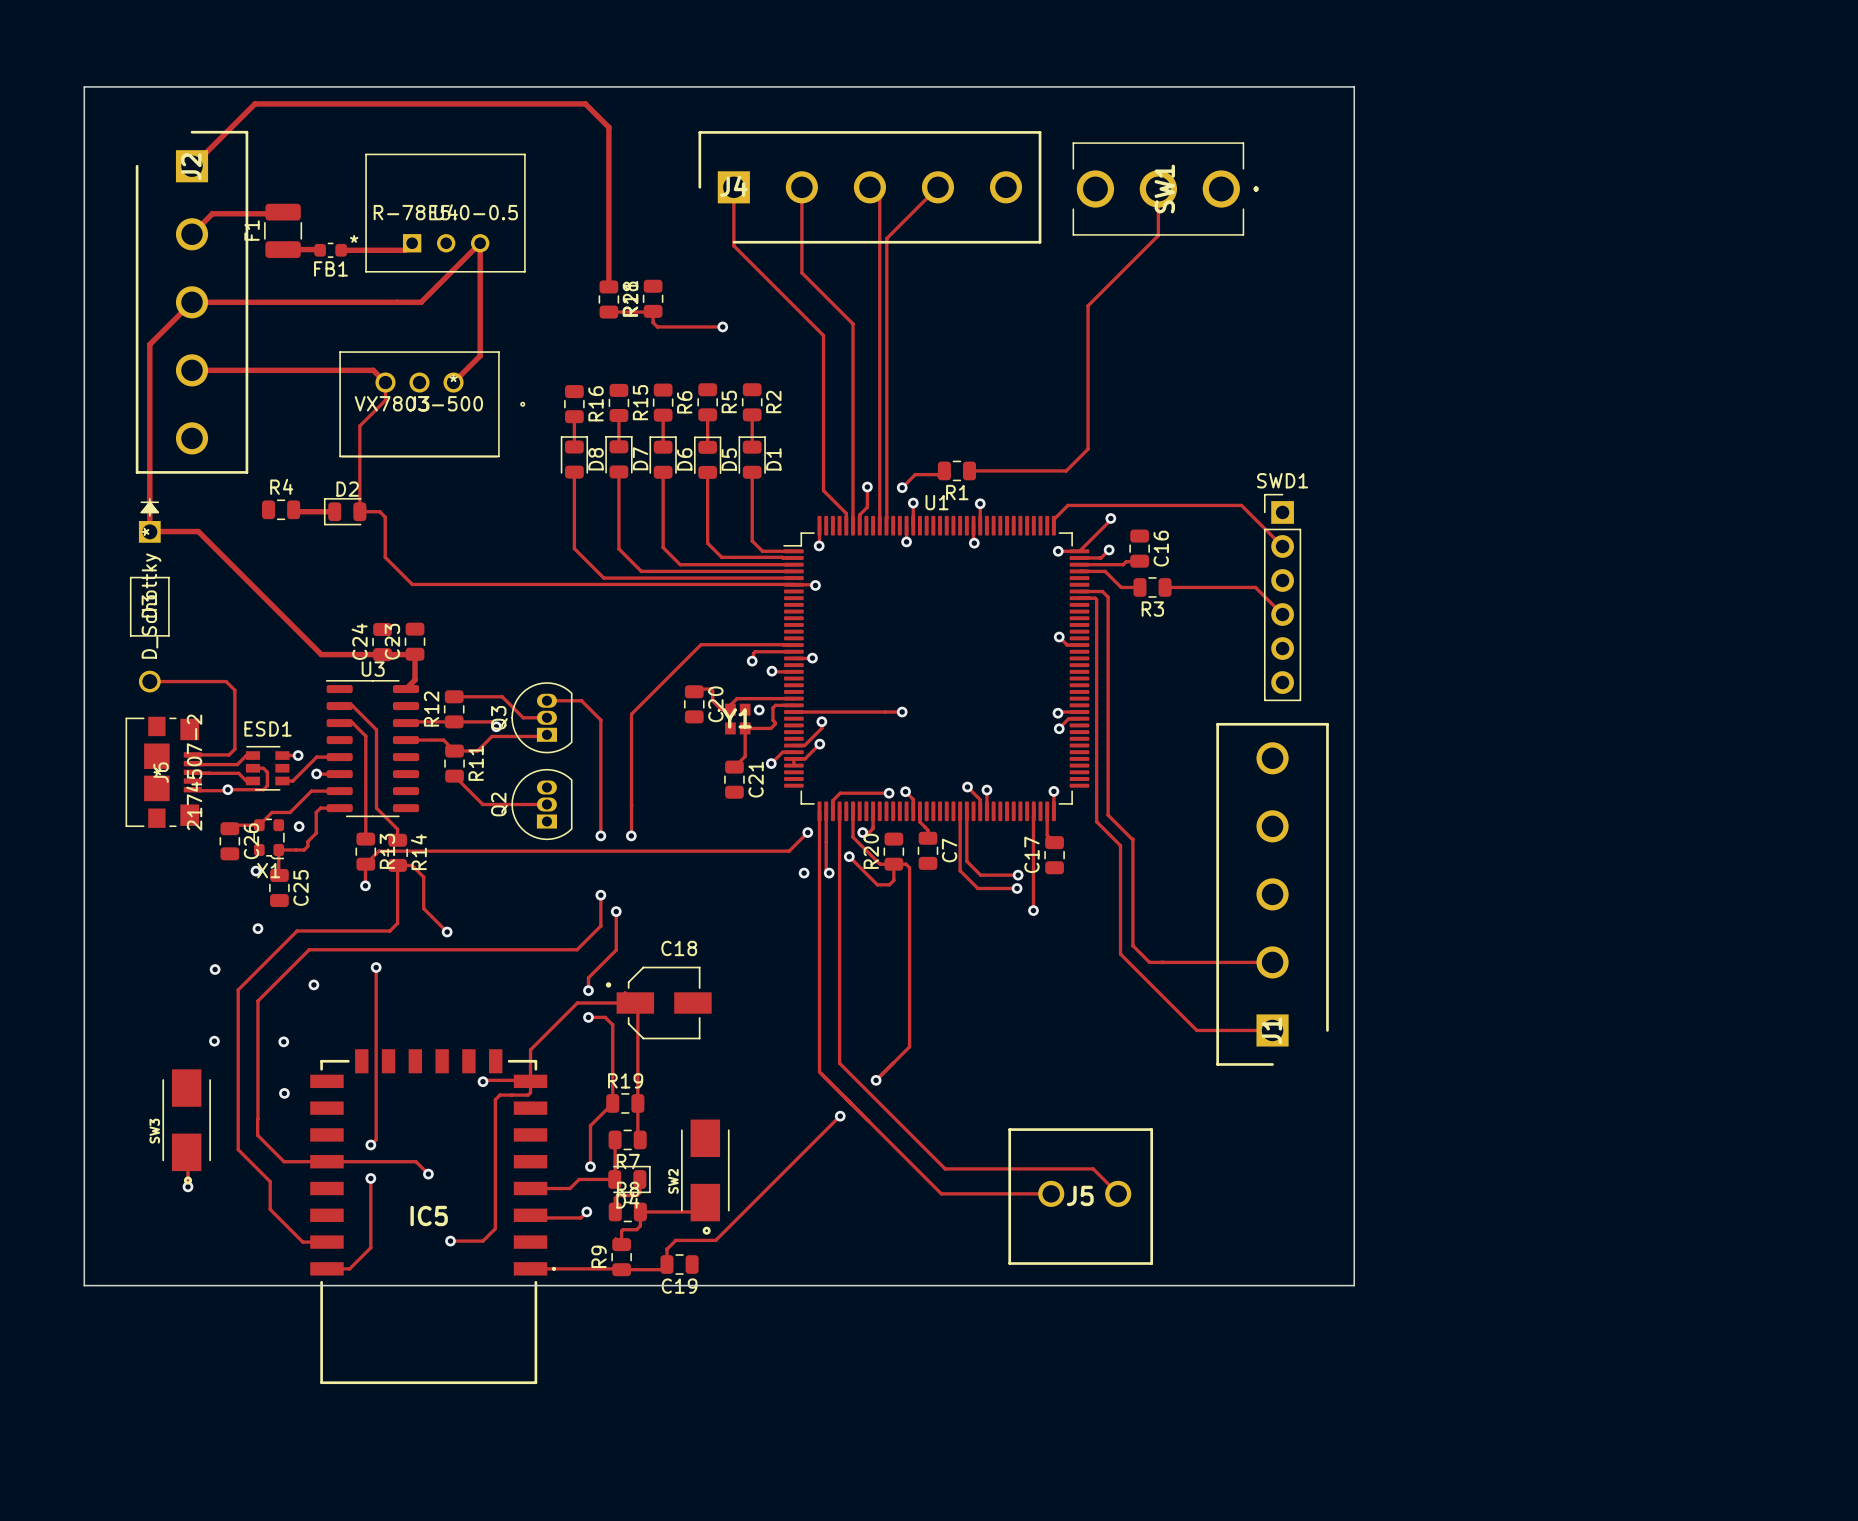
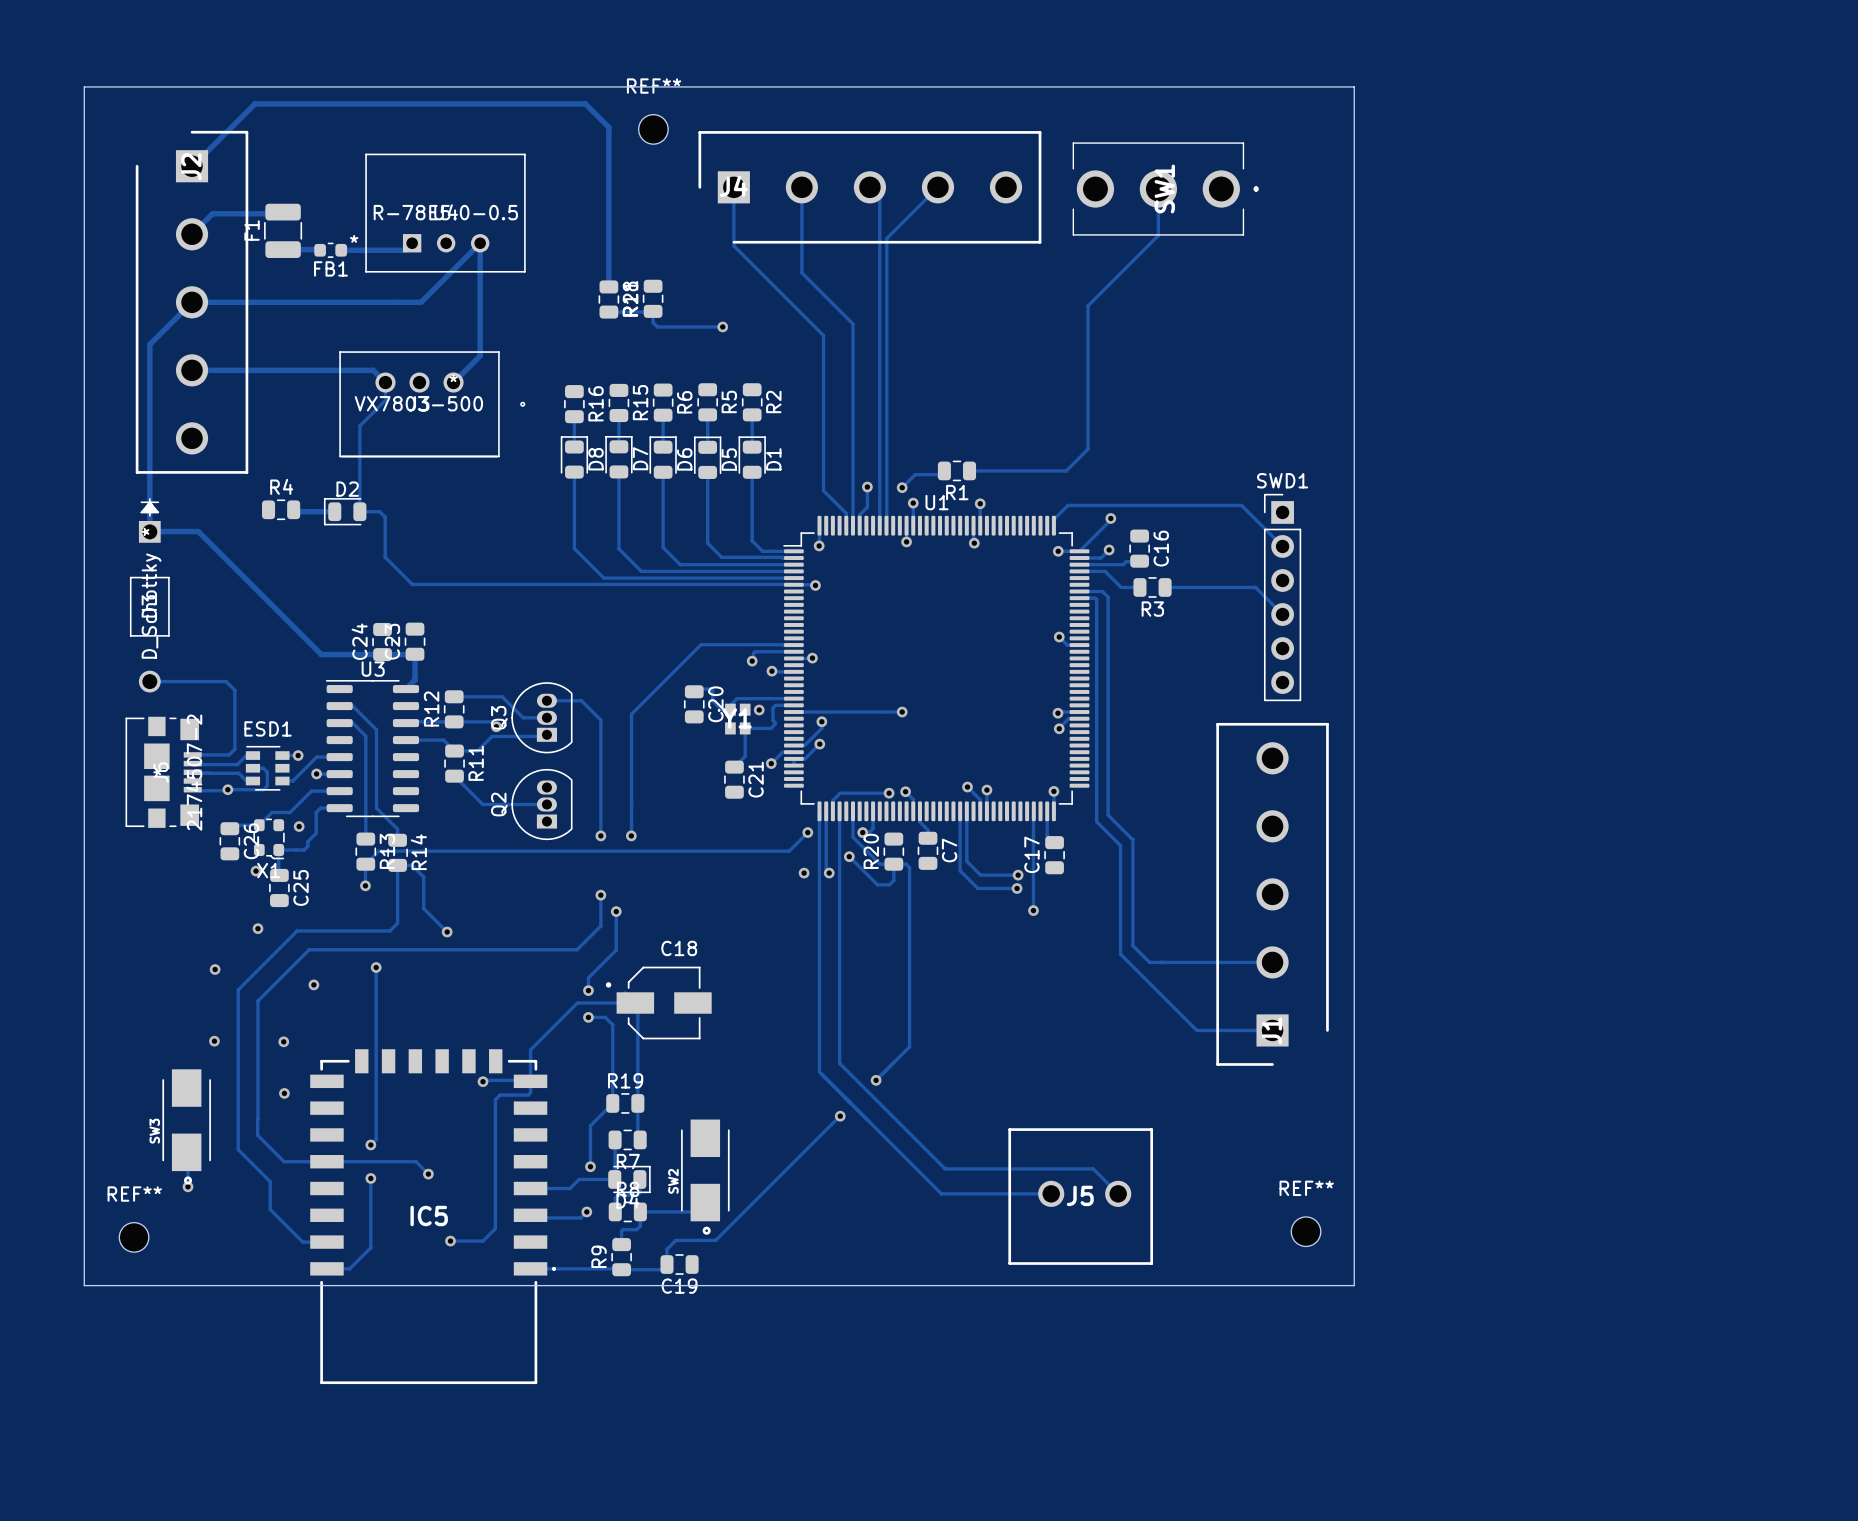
REF**: none -> (653, 129)
REF**: none -> (1306, 1231)
REF**: none -> (134, 1237)

